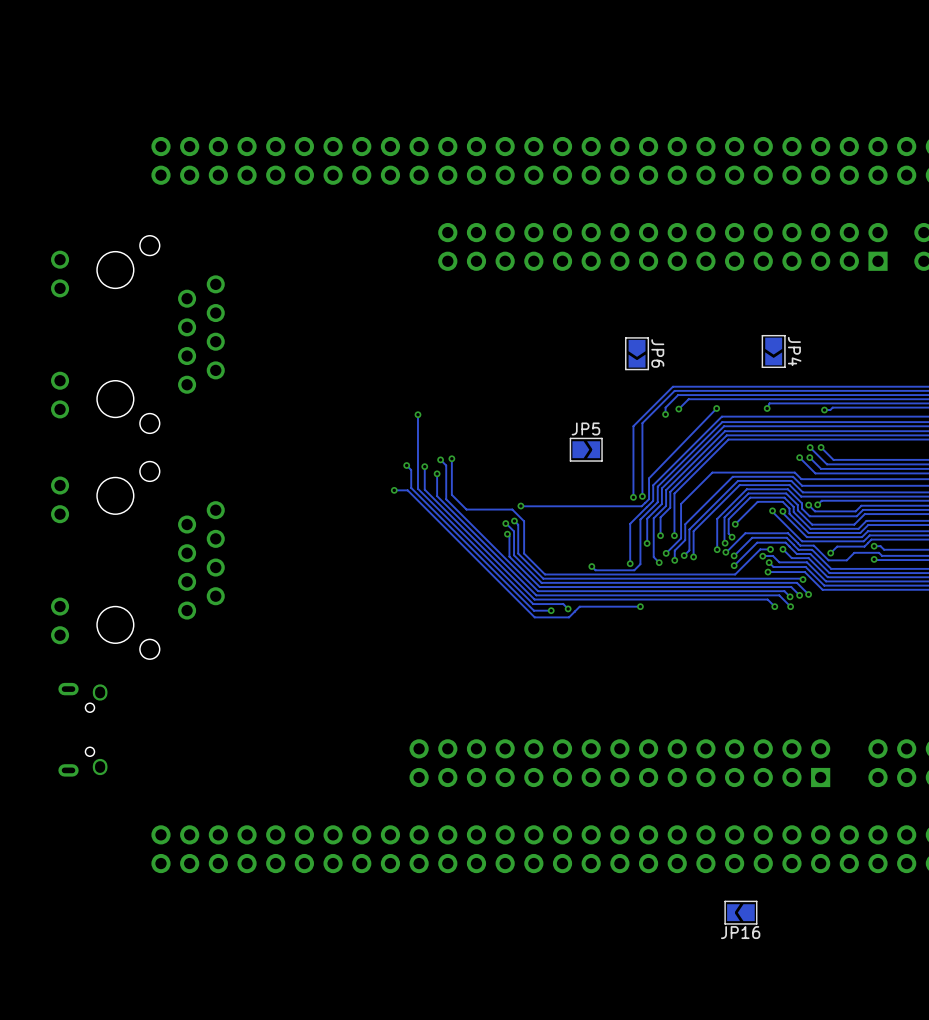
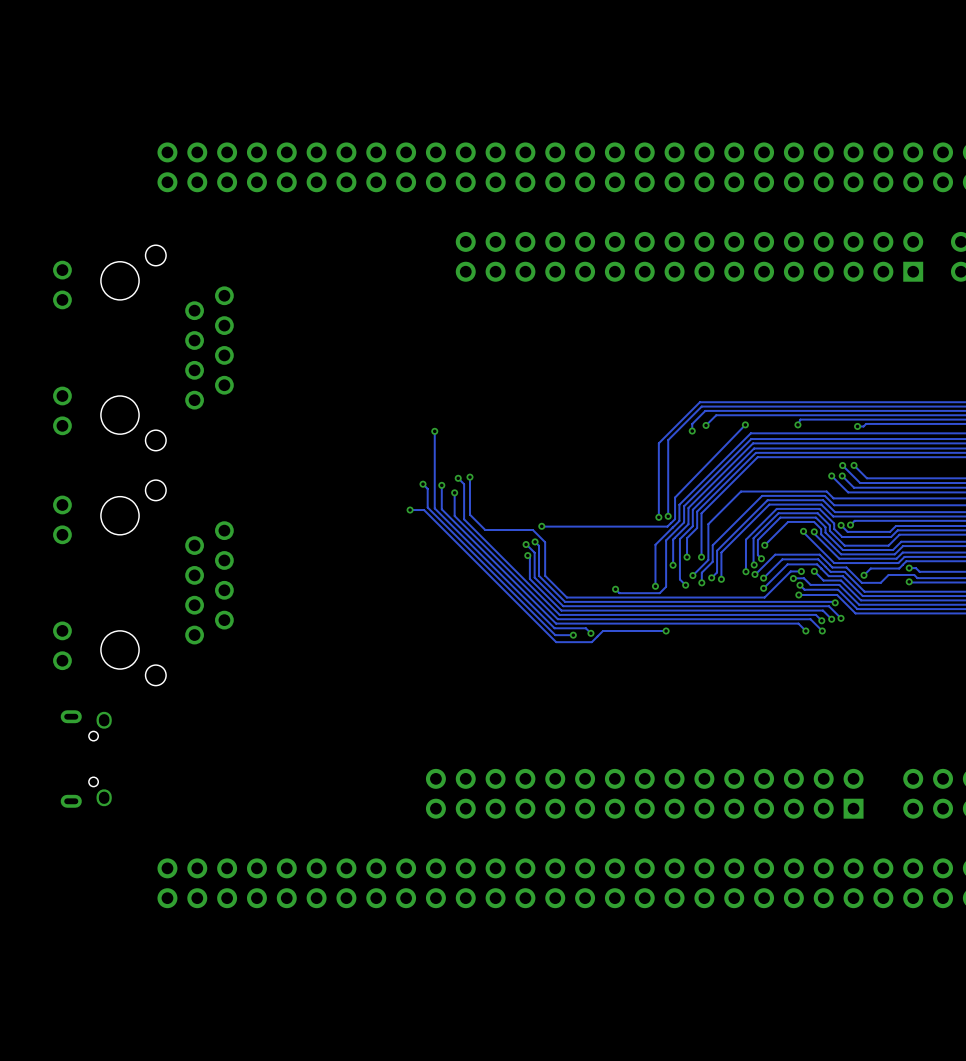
JP4: (773, 351) -> none
JP6: (637, 353) -> none
JP5: (586, 449) -> none
JP16: (740, 912) -> none

